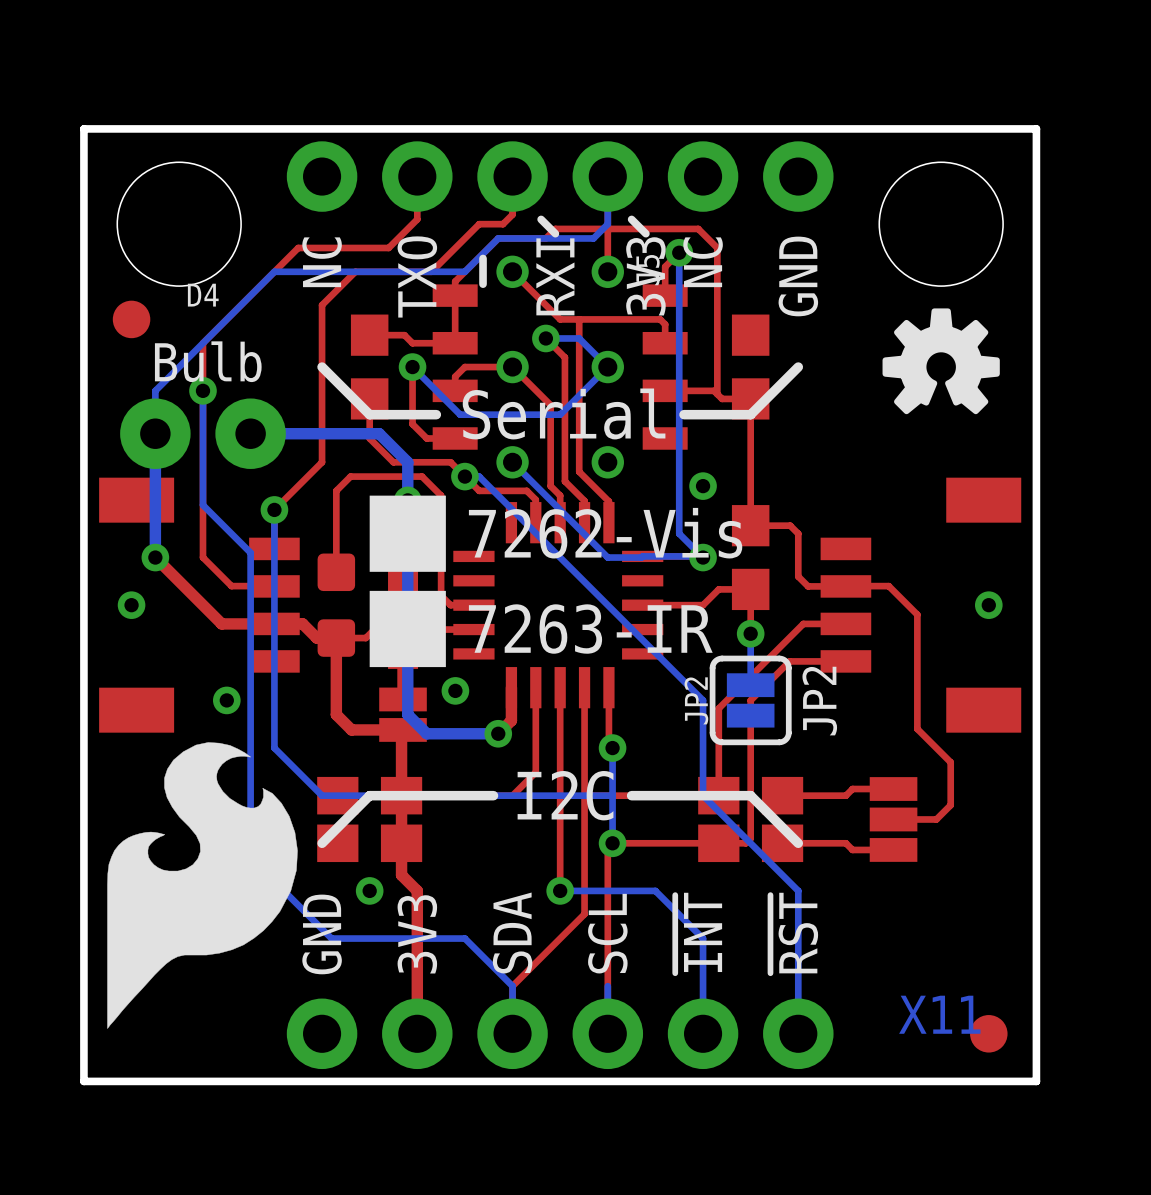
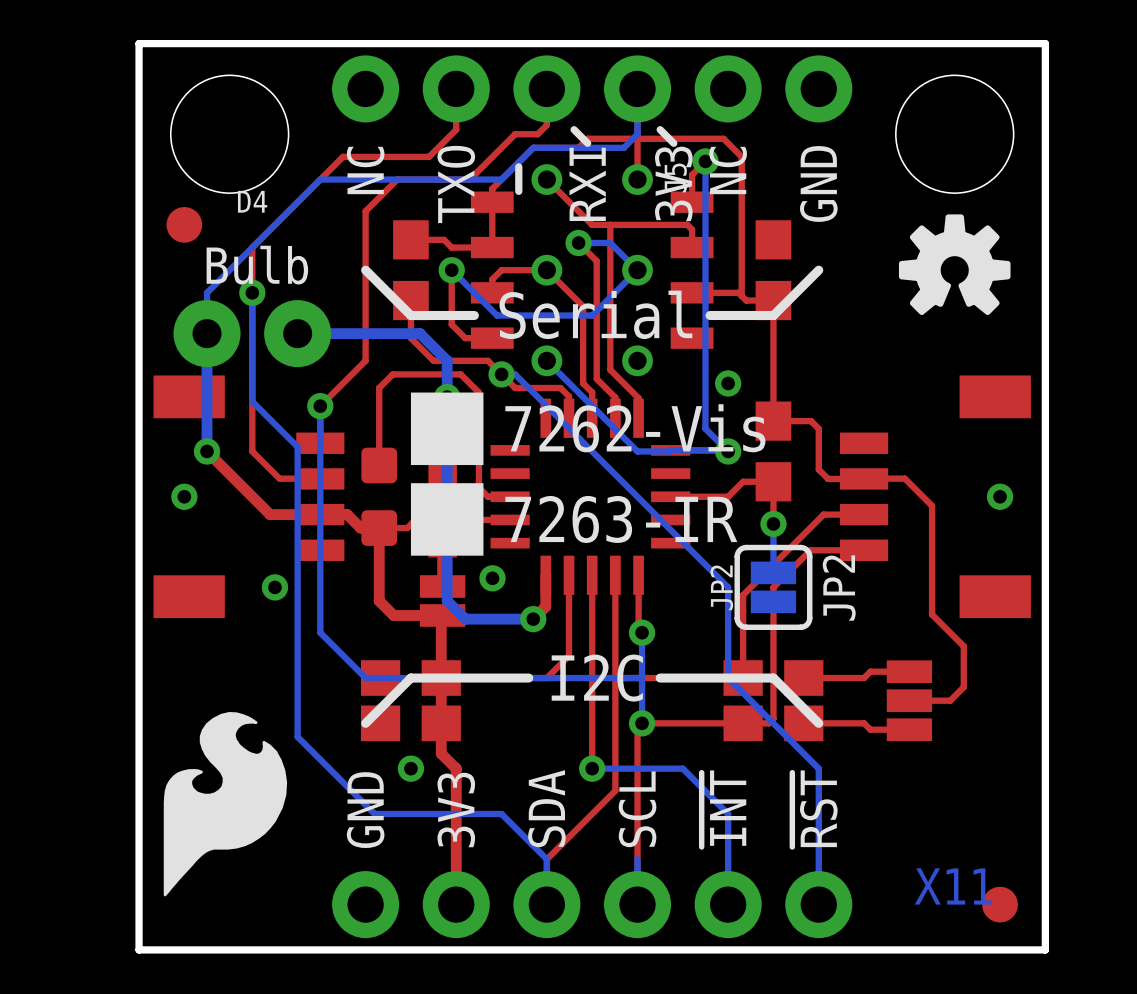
drawing: [107, 742, 298, 1029] -> none
drawing: none -> [163, 712, 288, 897]

